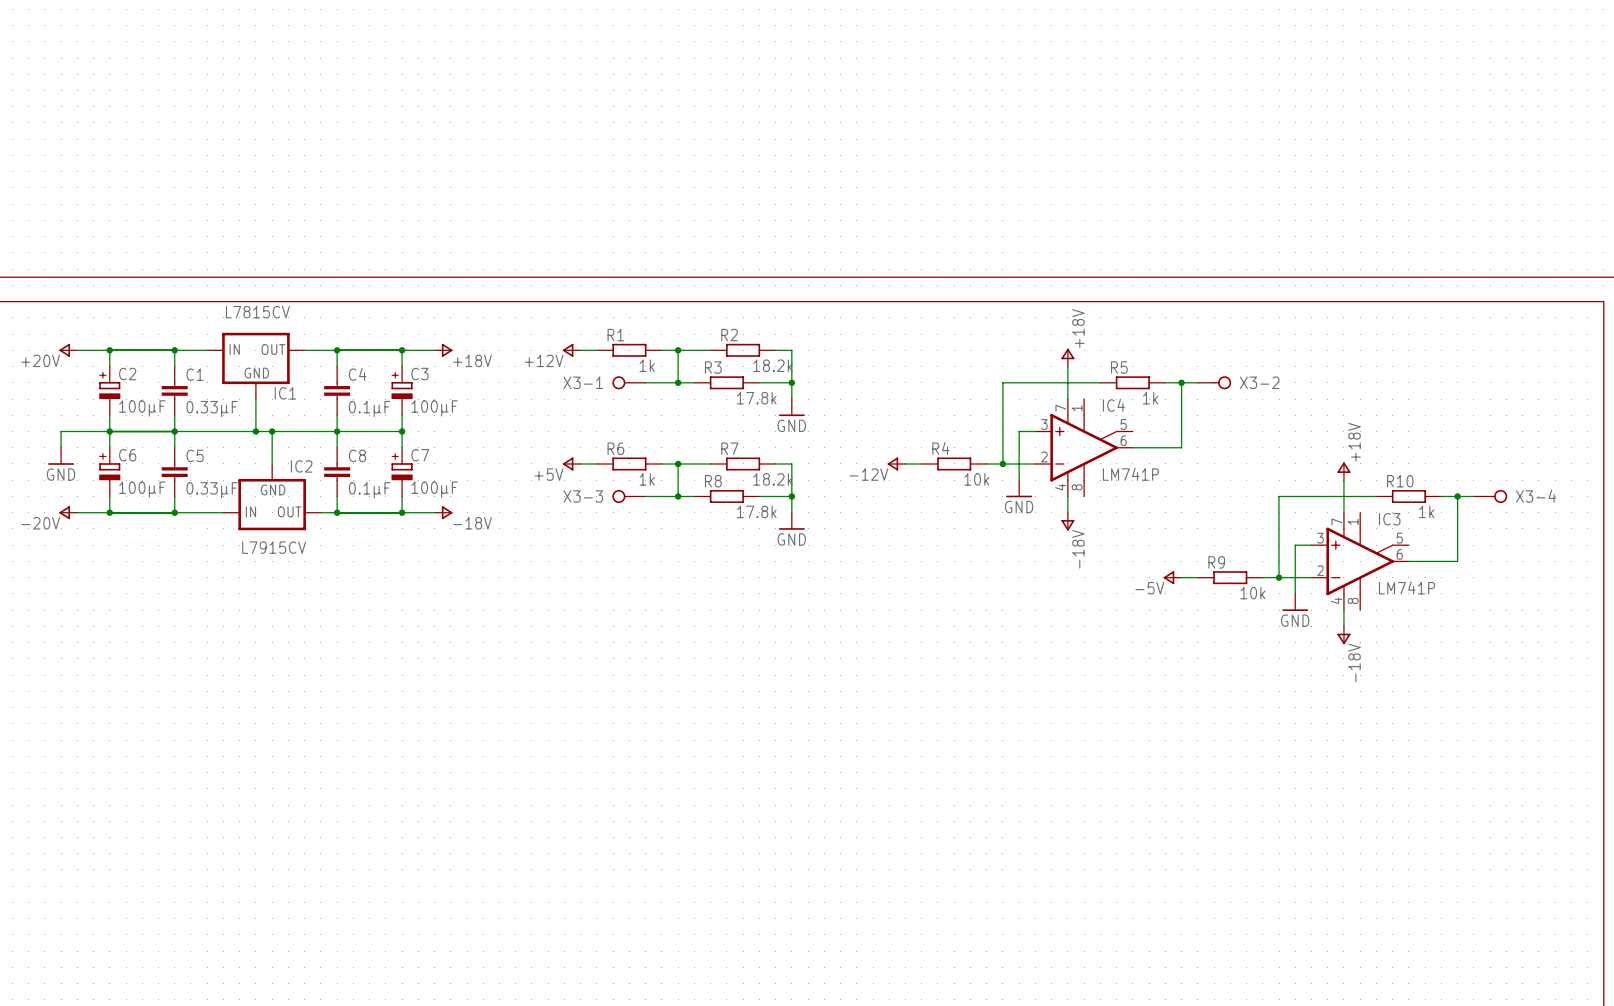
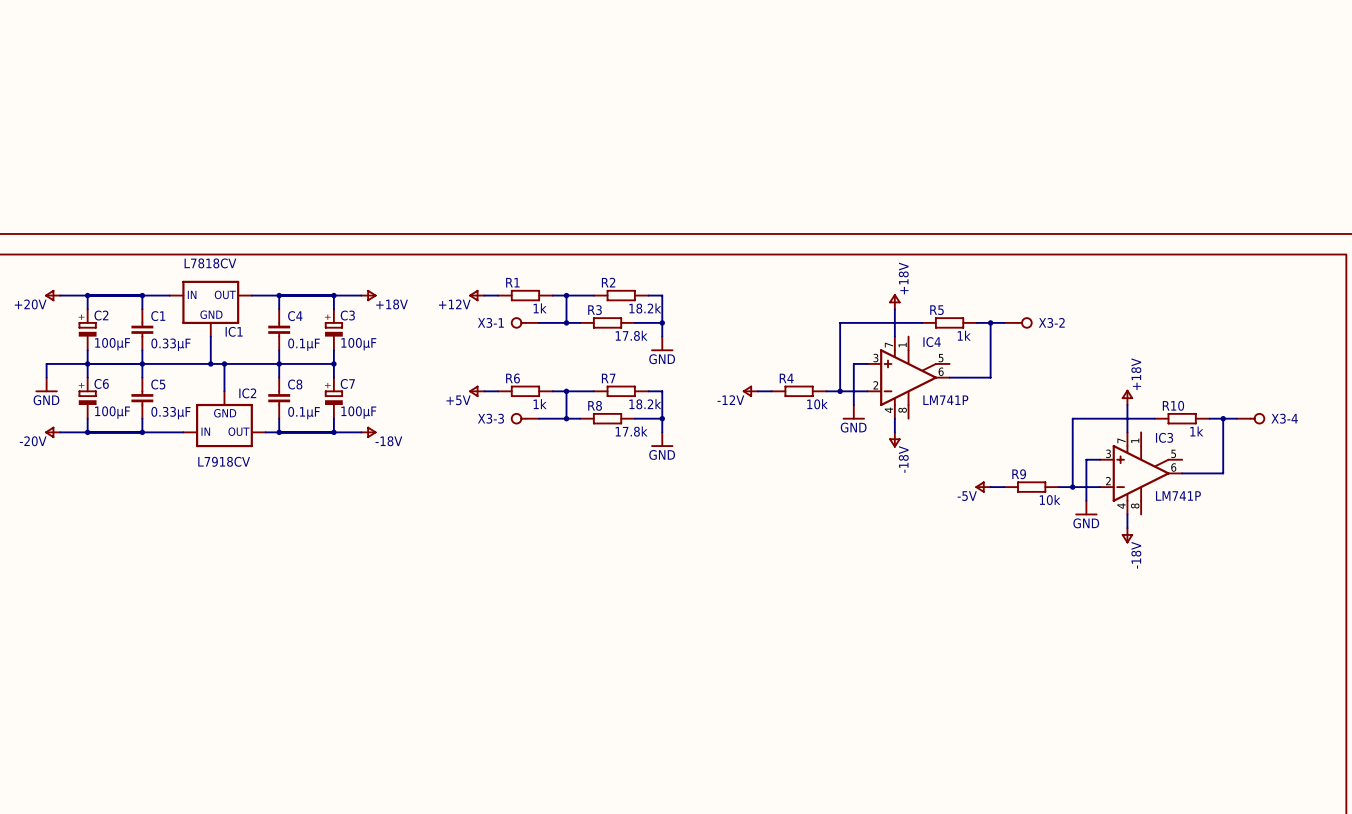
IC1 value: L7815CV (257, 312) -> L7818CV (210, 263)
IC2 value: L7915CV (274, 547) -> L7918CV (224, 461)

